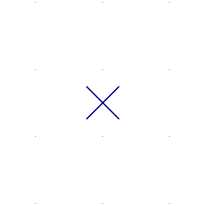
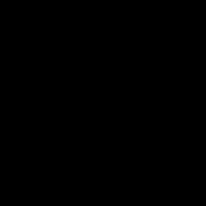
no-connect mark: (102, 102) -> none

